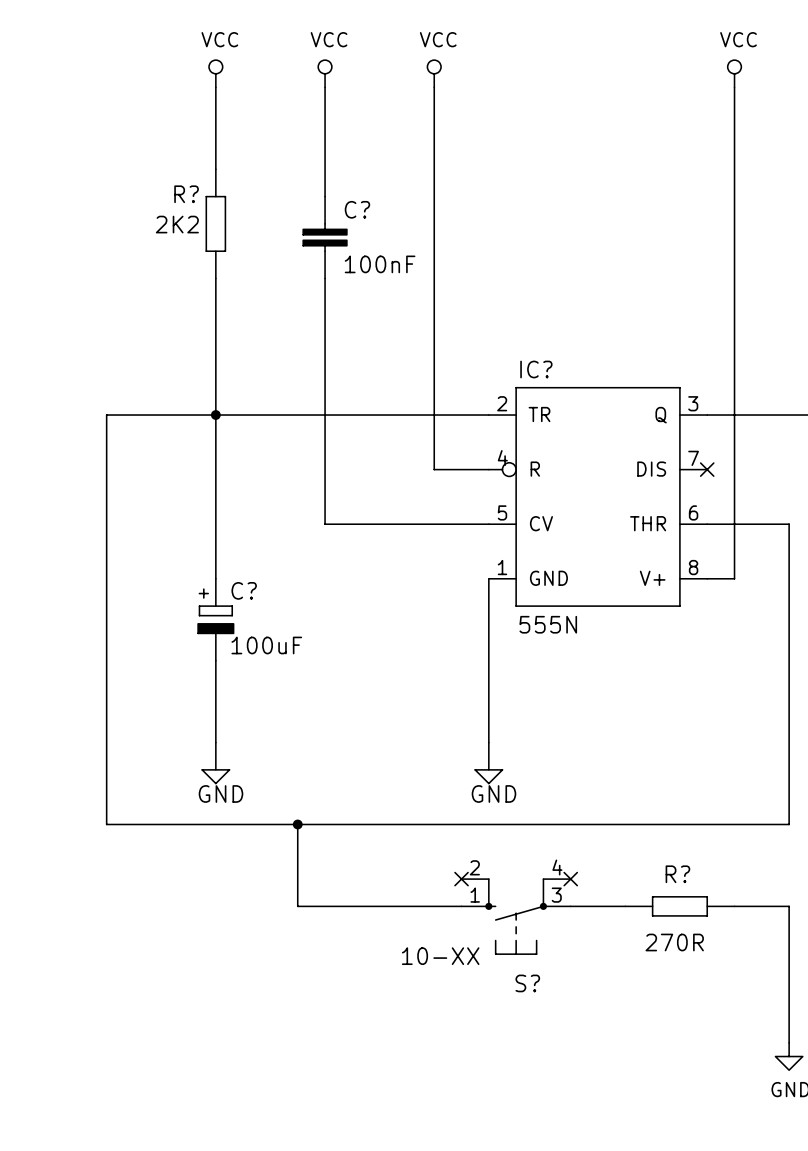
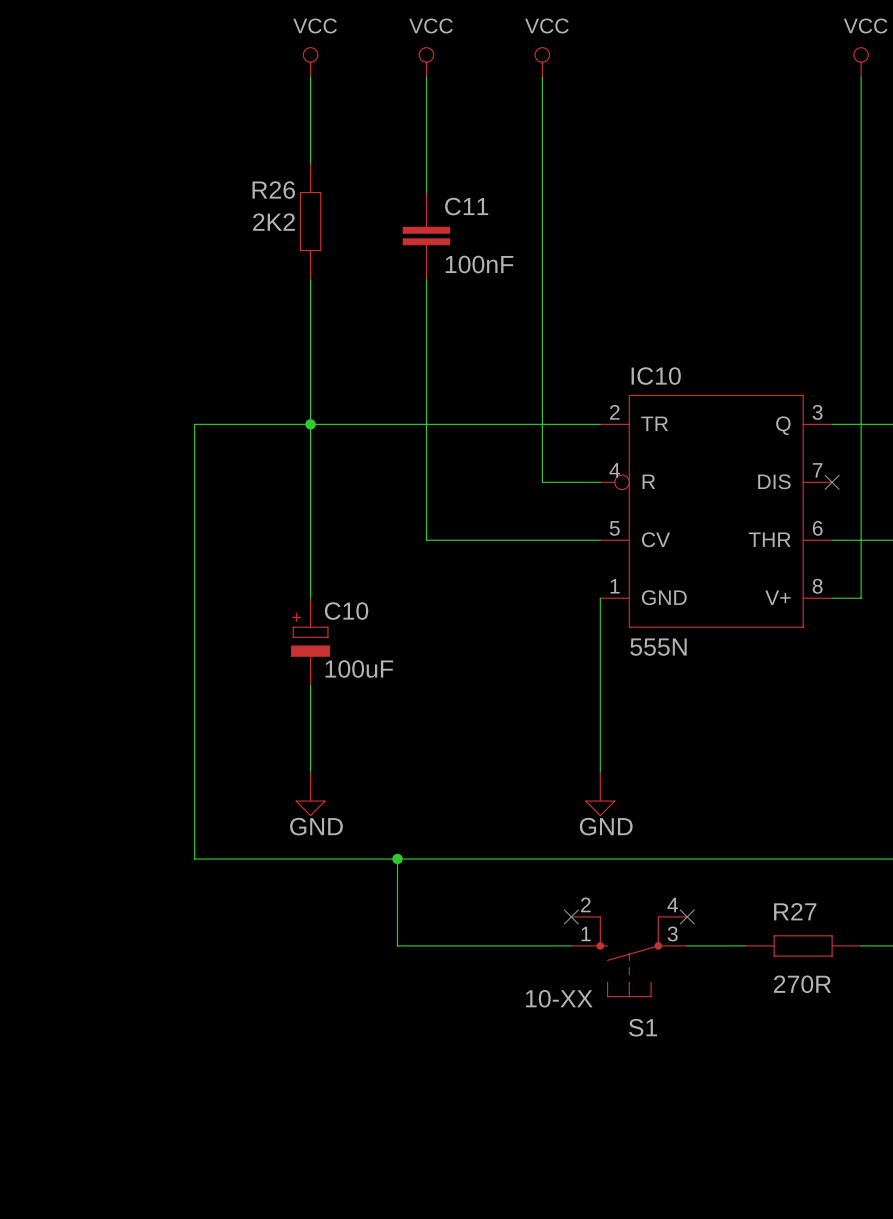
R? name: R? (186, 194) -> R26 (273, 190)
C? name: C? (357, 209) -> C11 (466, 206)
IC? name: IC? (536, 369) -> IC10 (656, 376)
C? name: C? (244, 590) -> C10 (346, 611)
R? name: R? (677, 874) -> R27 (795, 911)
S? name: S? (527, 983) -> S1 (643, 1027)

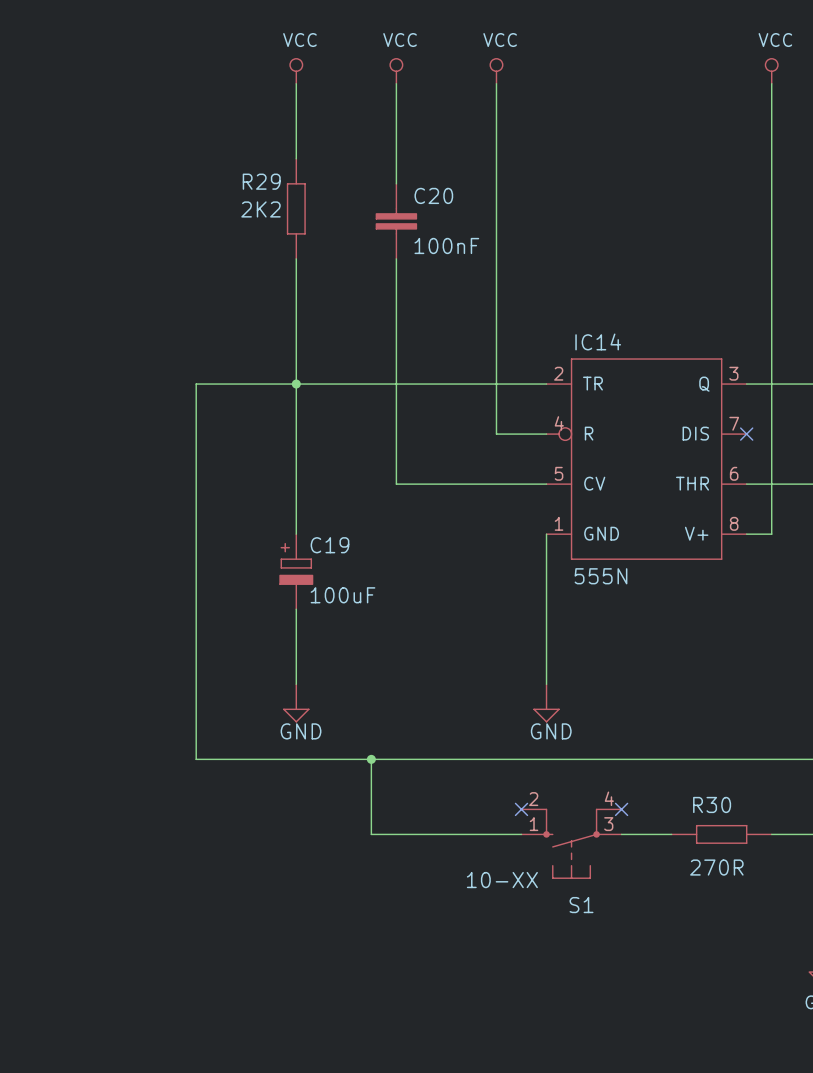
R26 name: R26 (273, 190) -> R29 (261, 181)
C11 name: C11 (466, 206) -> C20 (433, 195)
IC10 name: IC10 (656, 376) -> IC14 (598, 341)
C10 name: C10 (346, 611) -> C19 (329, 545)
R27 name: R27 (795, 911) -> R30 (712, 804)

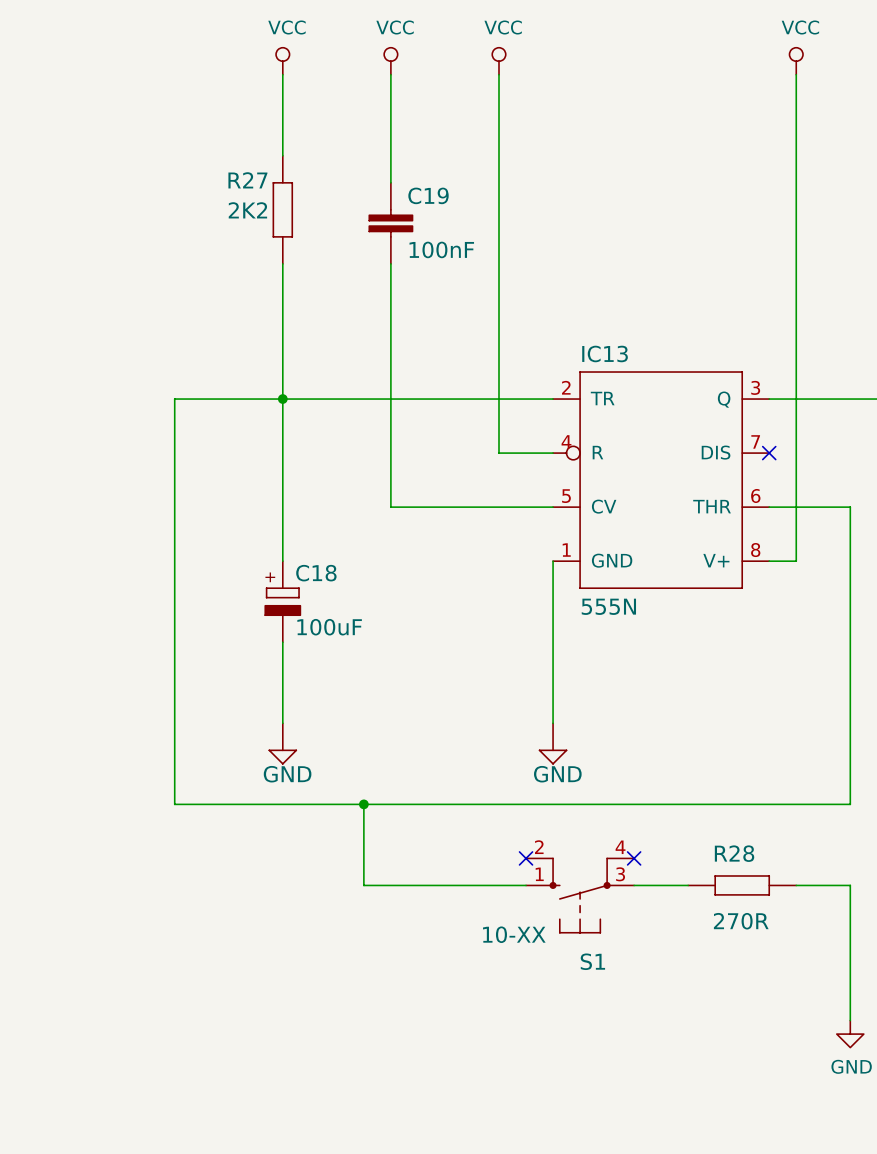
R29 name: R29 (261, 181) -> R27 (247, 180)
C20 name: C20 (433, 195) -> C19 (428, 195)
IC14 name: IC14 (598, 341) -> IC13 (605, 353)
C19 name: C19 (329, 545) -> C18 (316, 573)
R30 name: R30 (712, 804) -> R28 (734, 853)

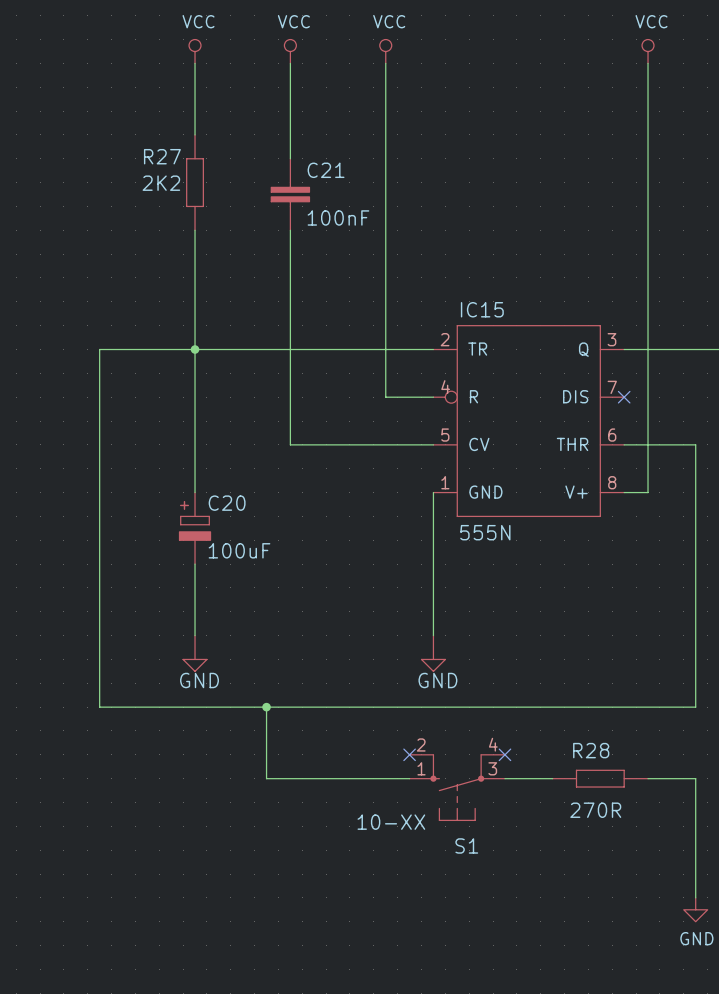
C19 name: C19 (428, 195) -> C21 (326, 170)
IC13 name: IC13 (605, 353) -> IC15 (482, 309)
C18 name: C18 (316, 573) -> C20 (227, 503)

